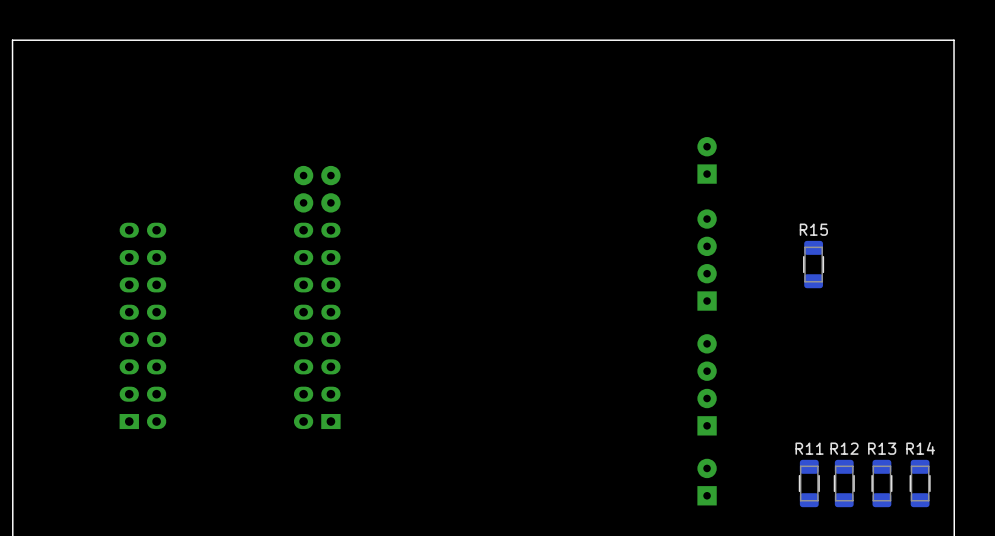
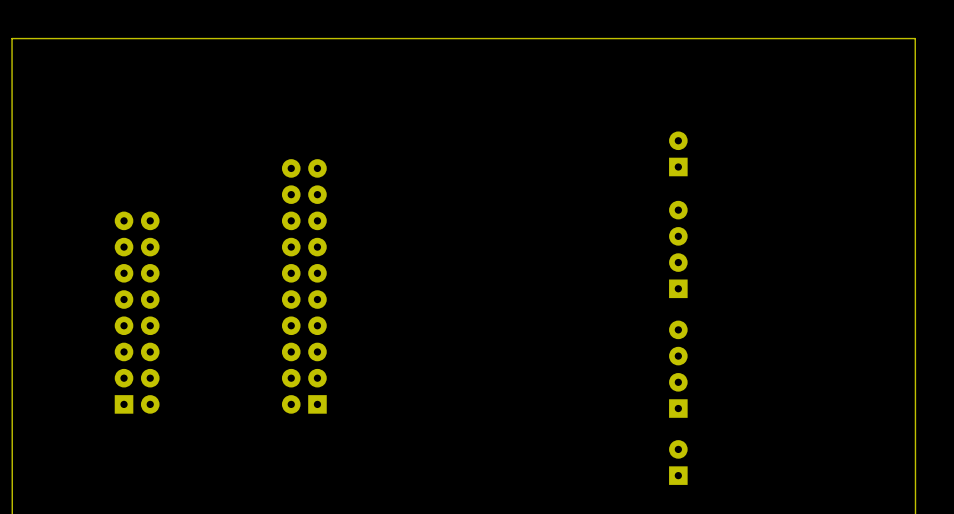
part footprint: [293, 165, 341, 430] -> [281, 159, 327, 414]
part footprint: [119, 222, 167, 430] -> [114, 211, 160, 414]
R15: (813, 264) -> none
R11: (809, 483) -> none
R12: (844, 483) -> none
R13: (881, 483) -> none
R14: (920, 483) -> none

